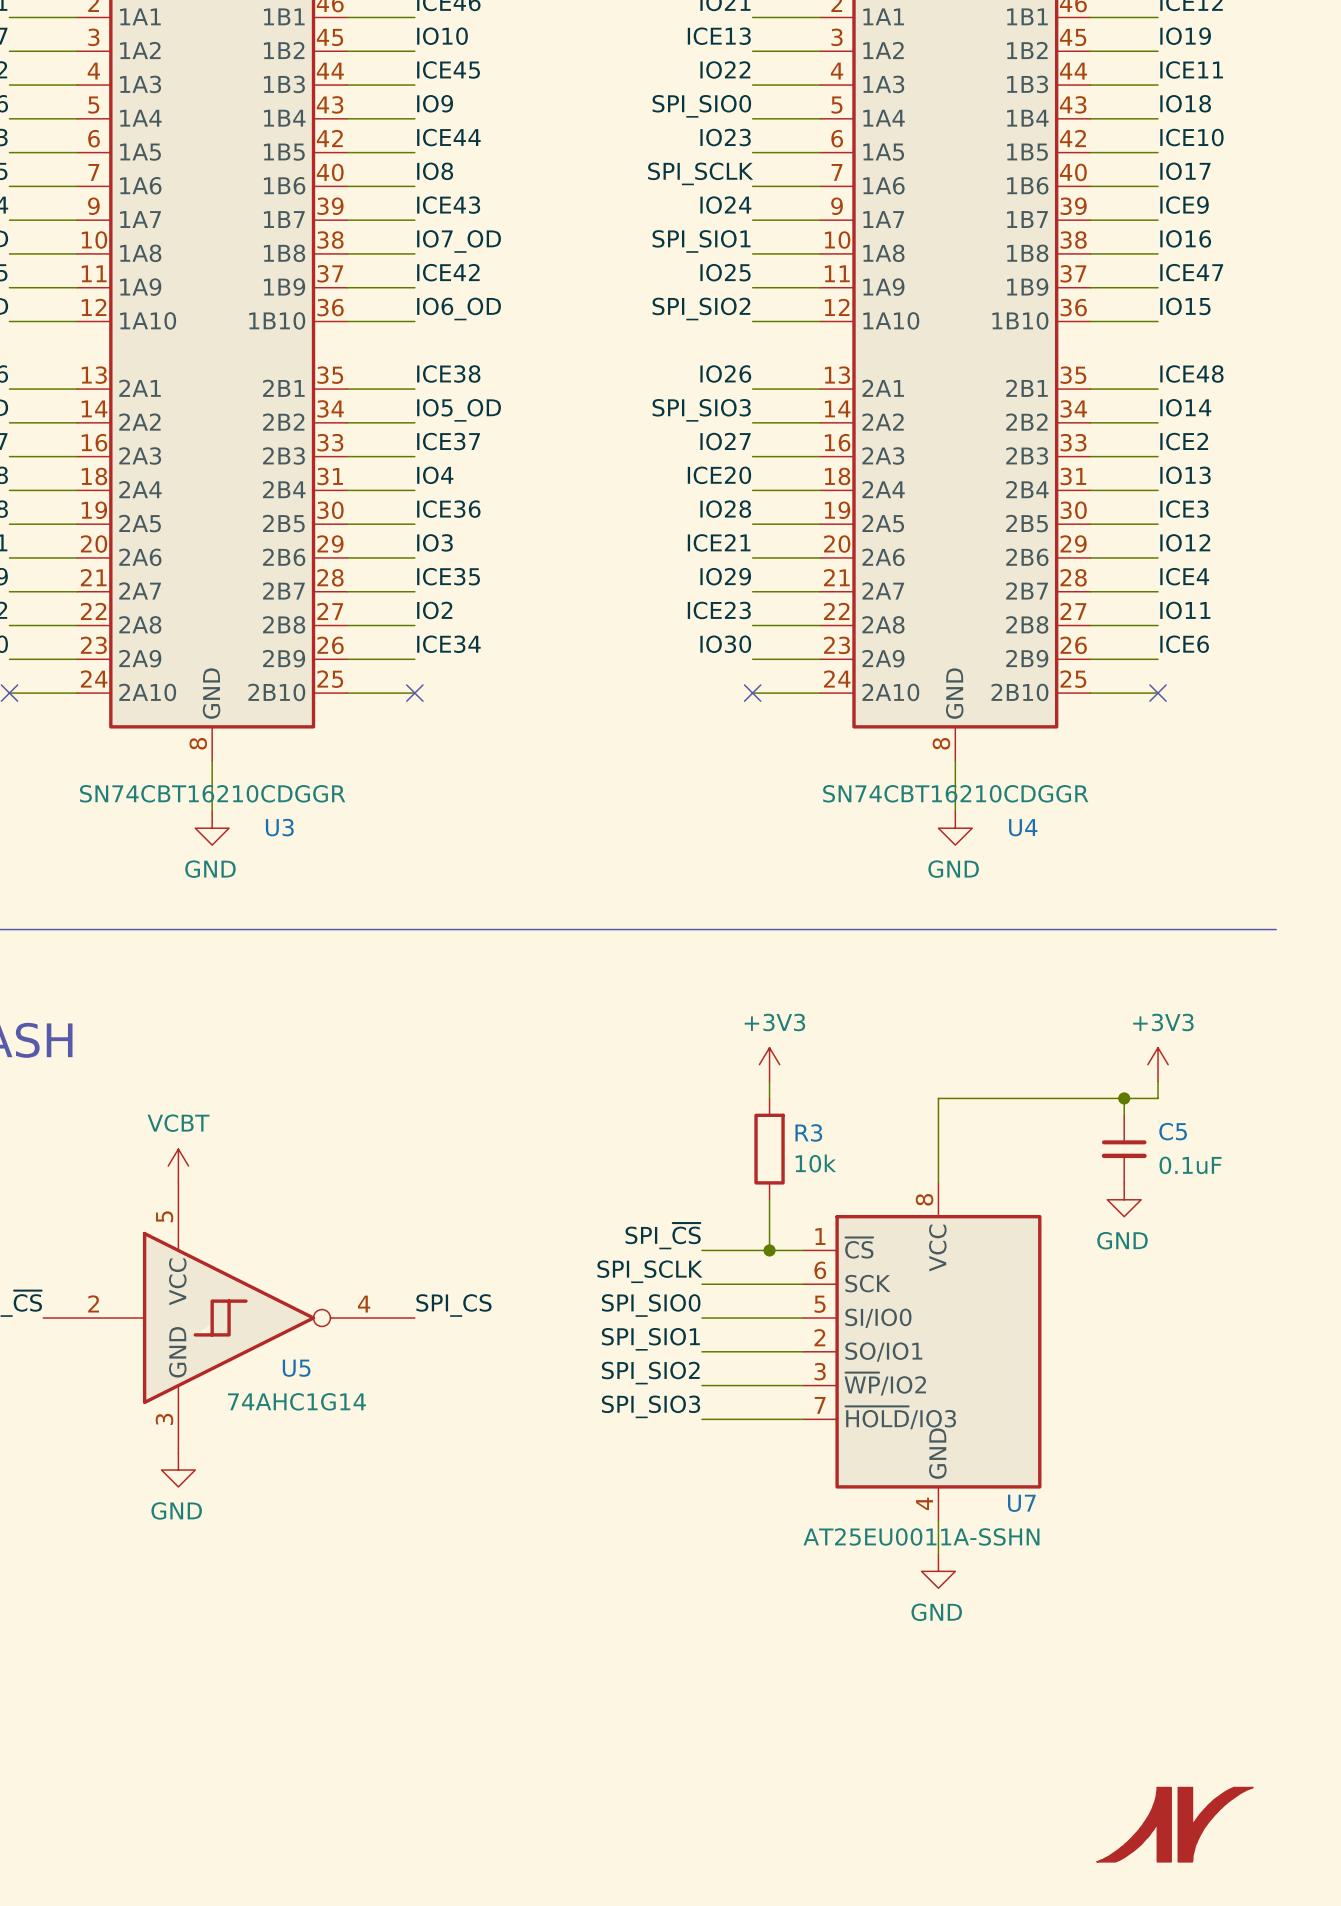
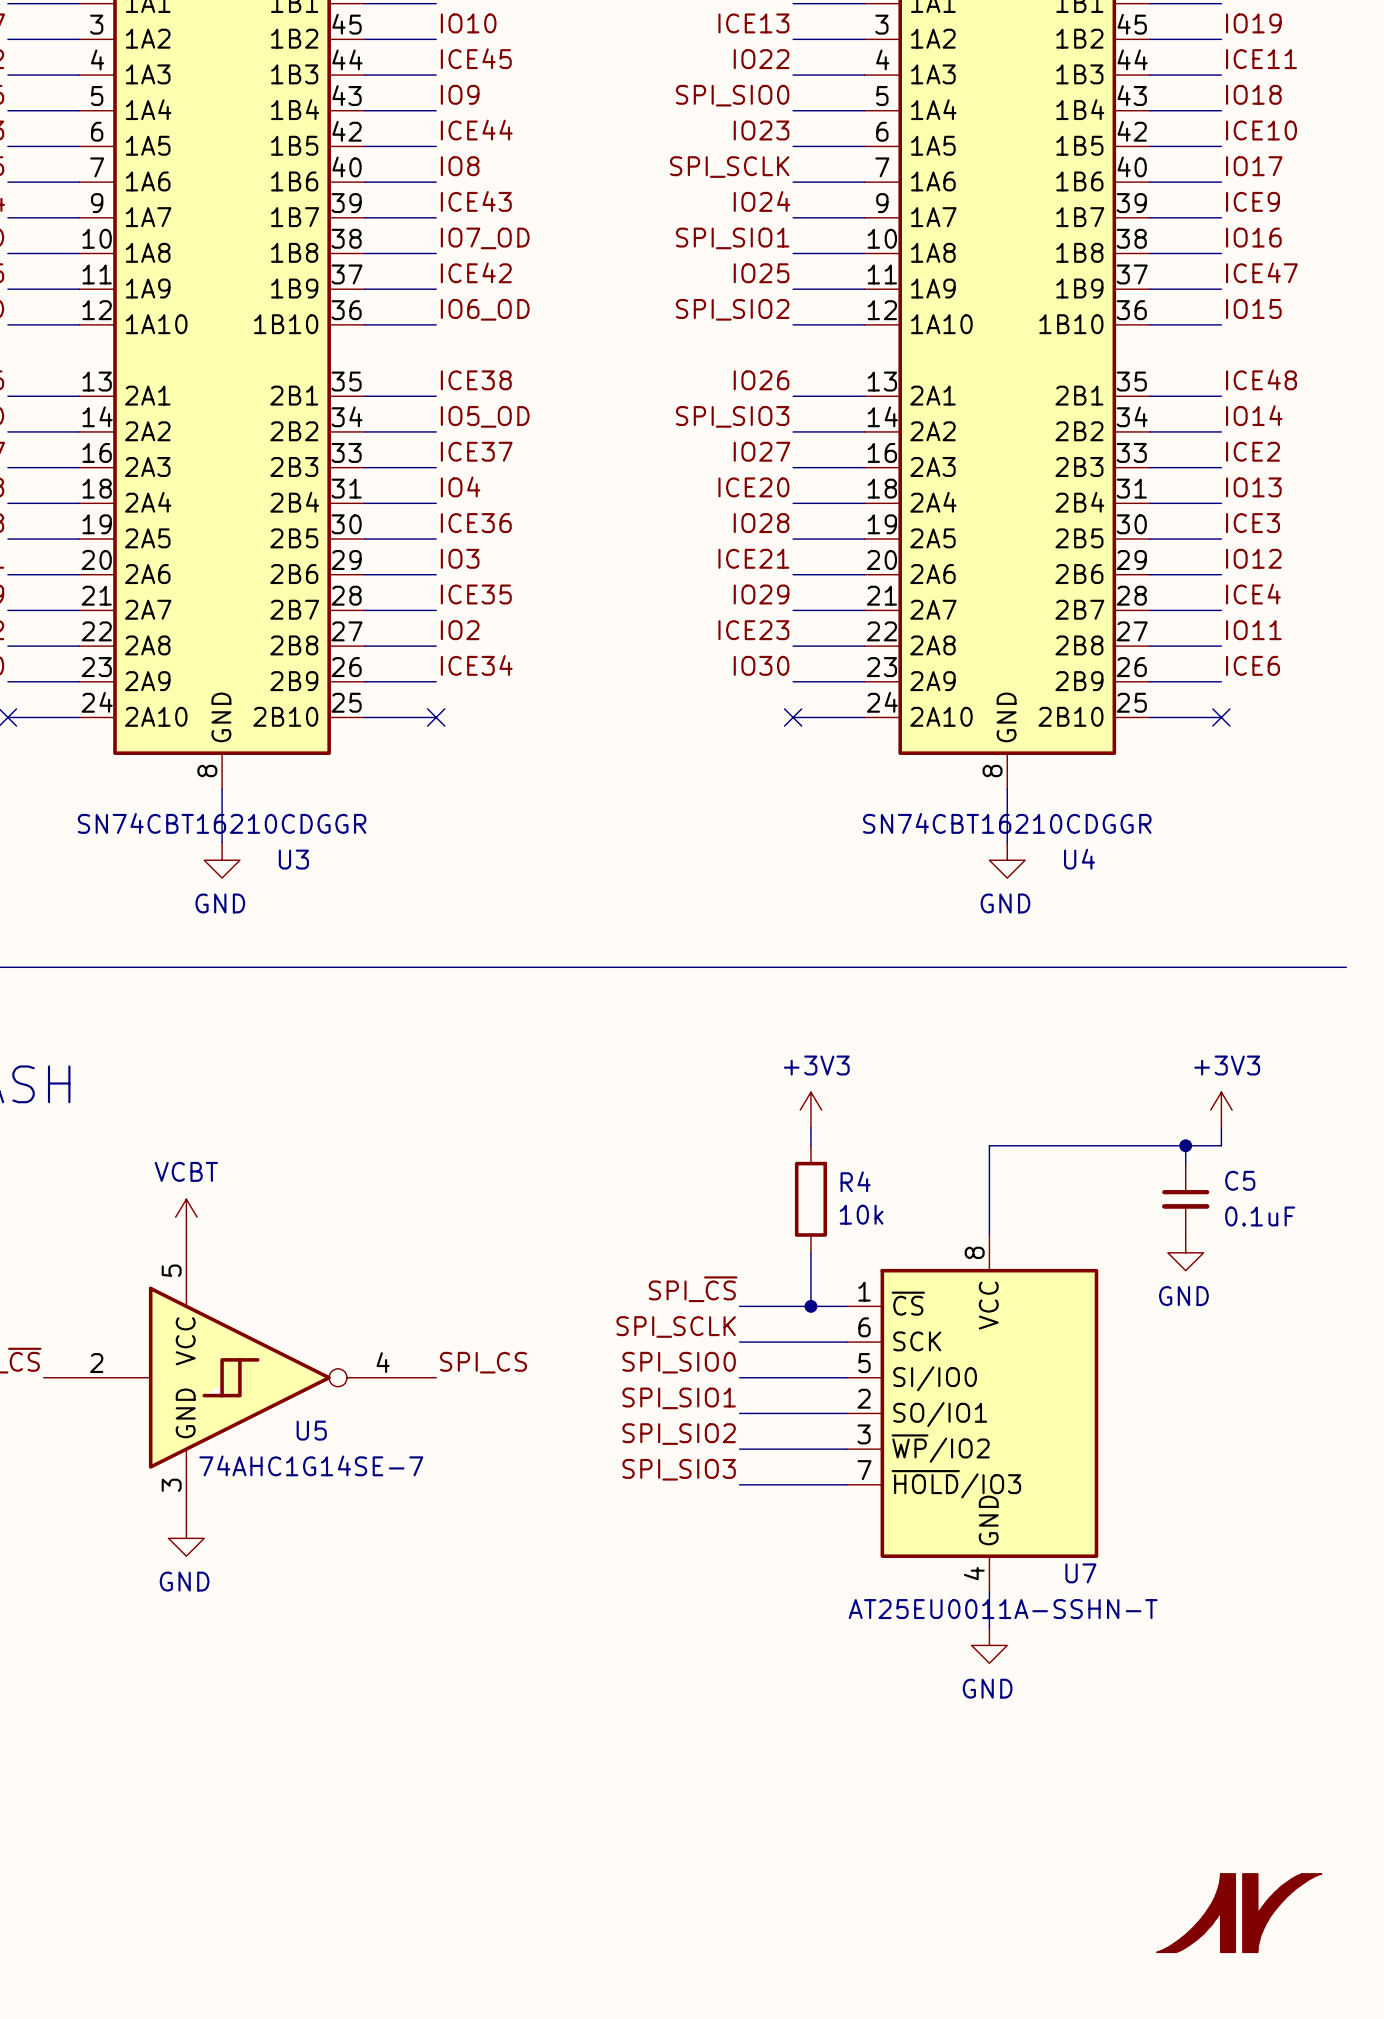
R3 name: R3 (808, 1132) -> R4 (855, 1181)
U5 value: 74AHC1G14 (296, 1401) -> 74AHC1G14SE-7 (311, 1465)
U7 value: AT25EU0011A-SSHN (921, 1536) -> AT25EU0011A-SSHN-T (1003, 1609)

